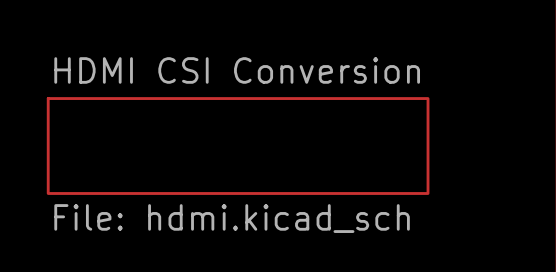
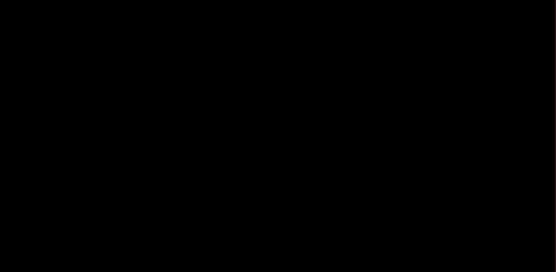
sheet HDMI CSI Conversion: File: hdmi.kicad_sch (238, 146) -> none

